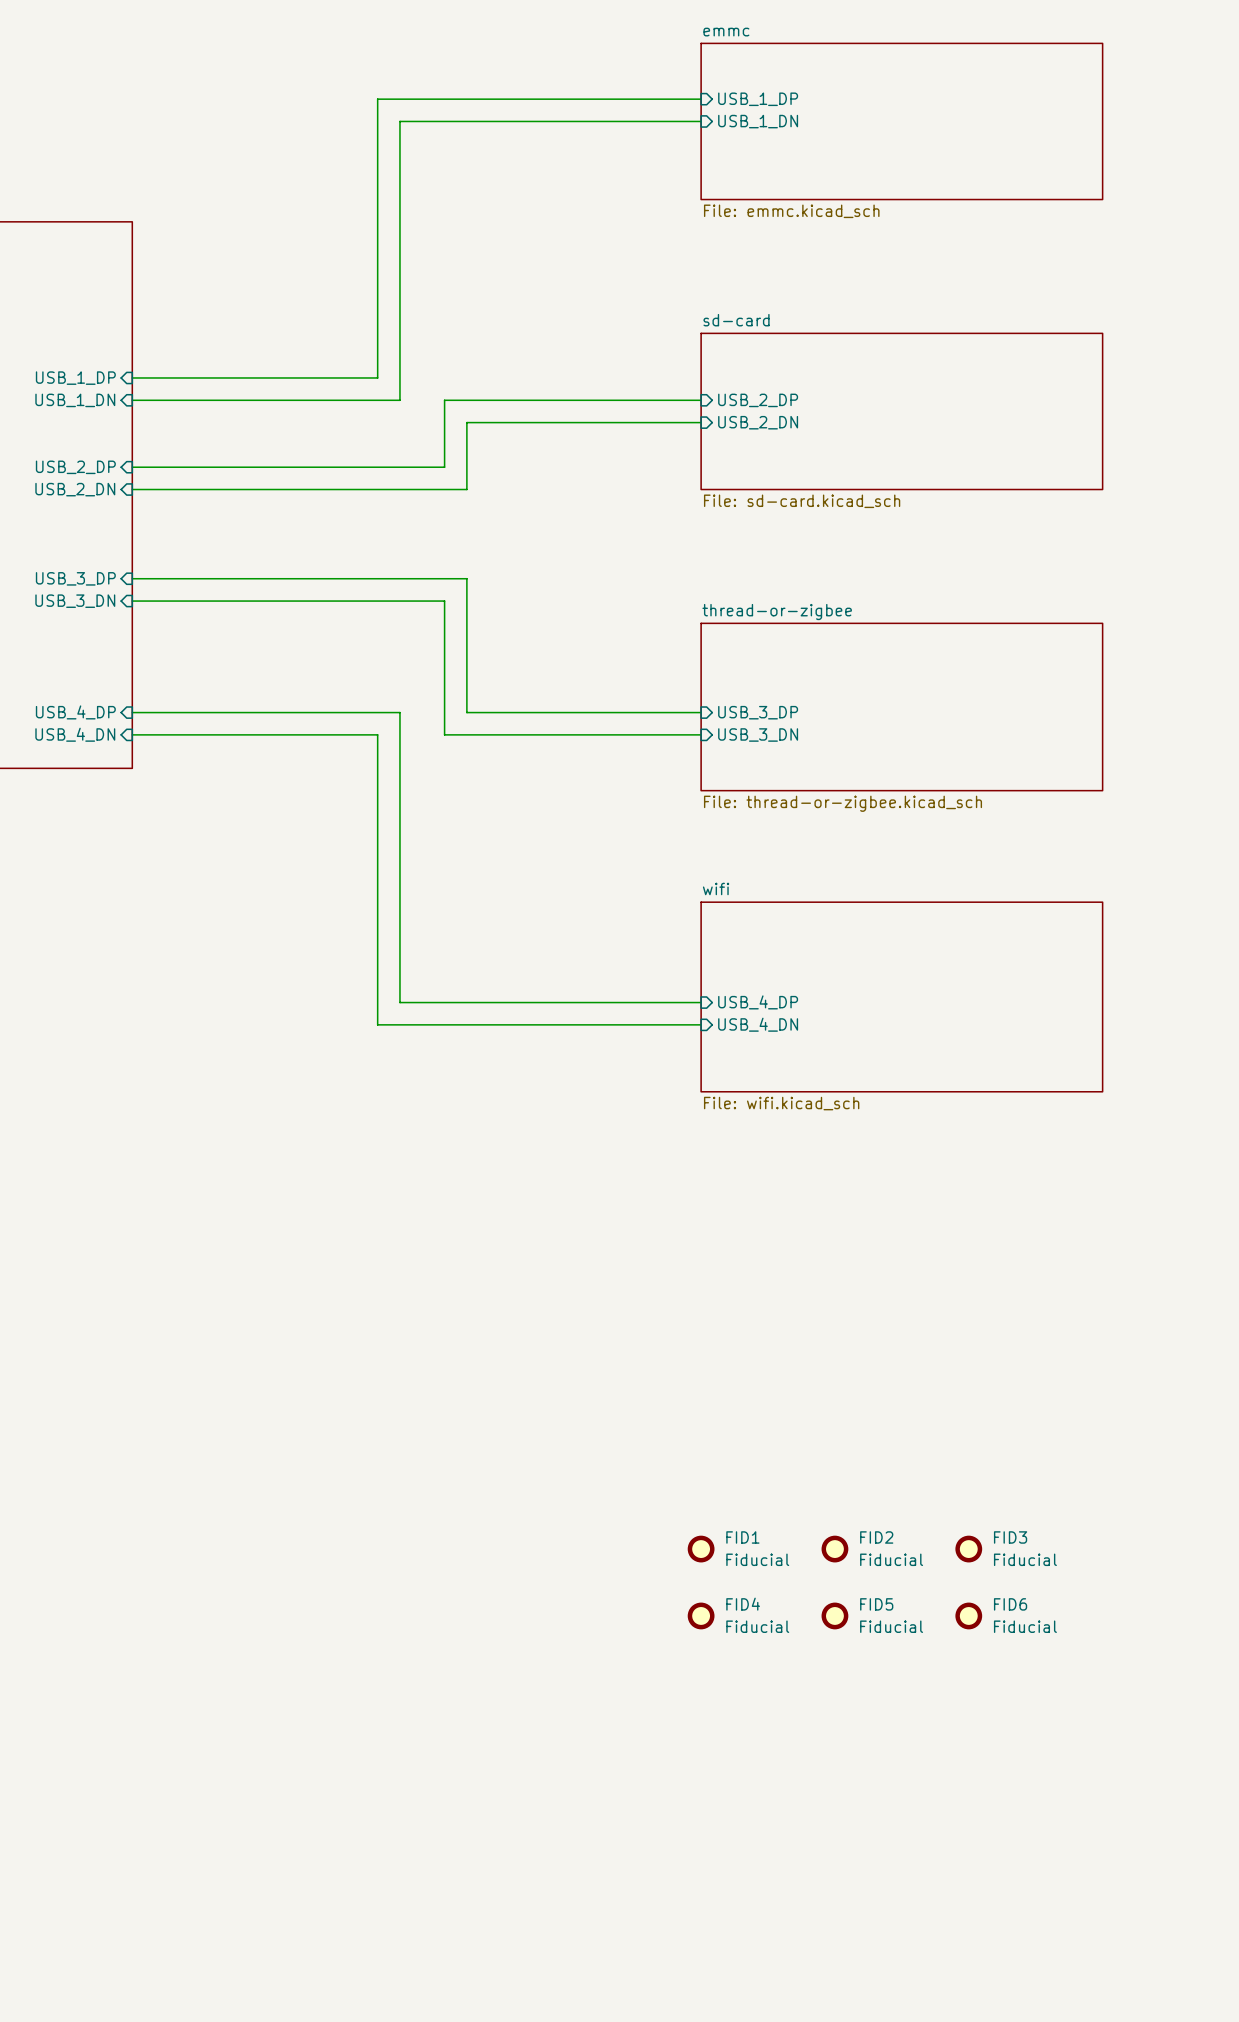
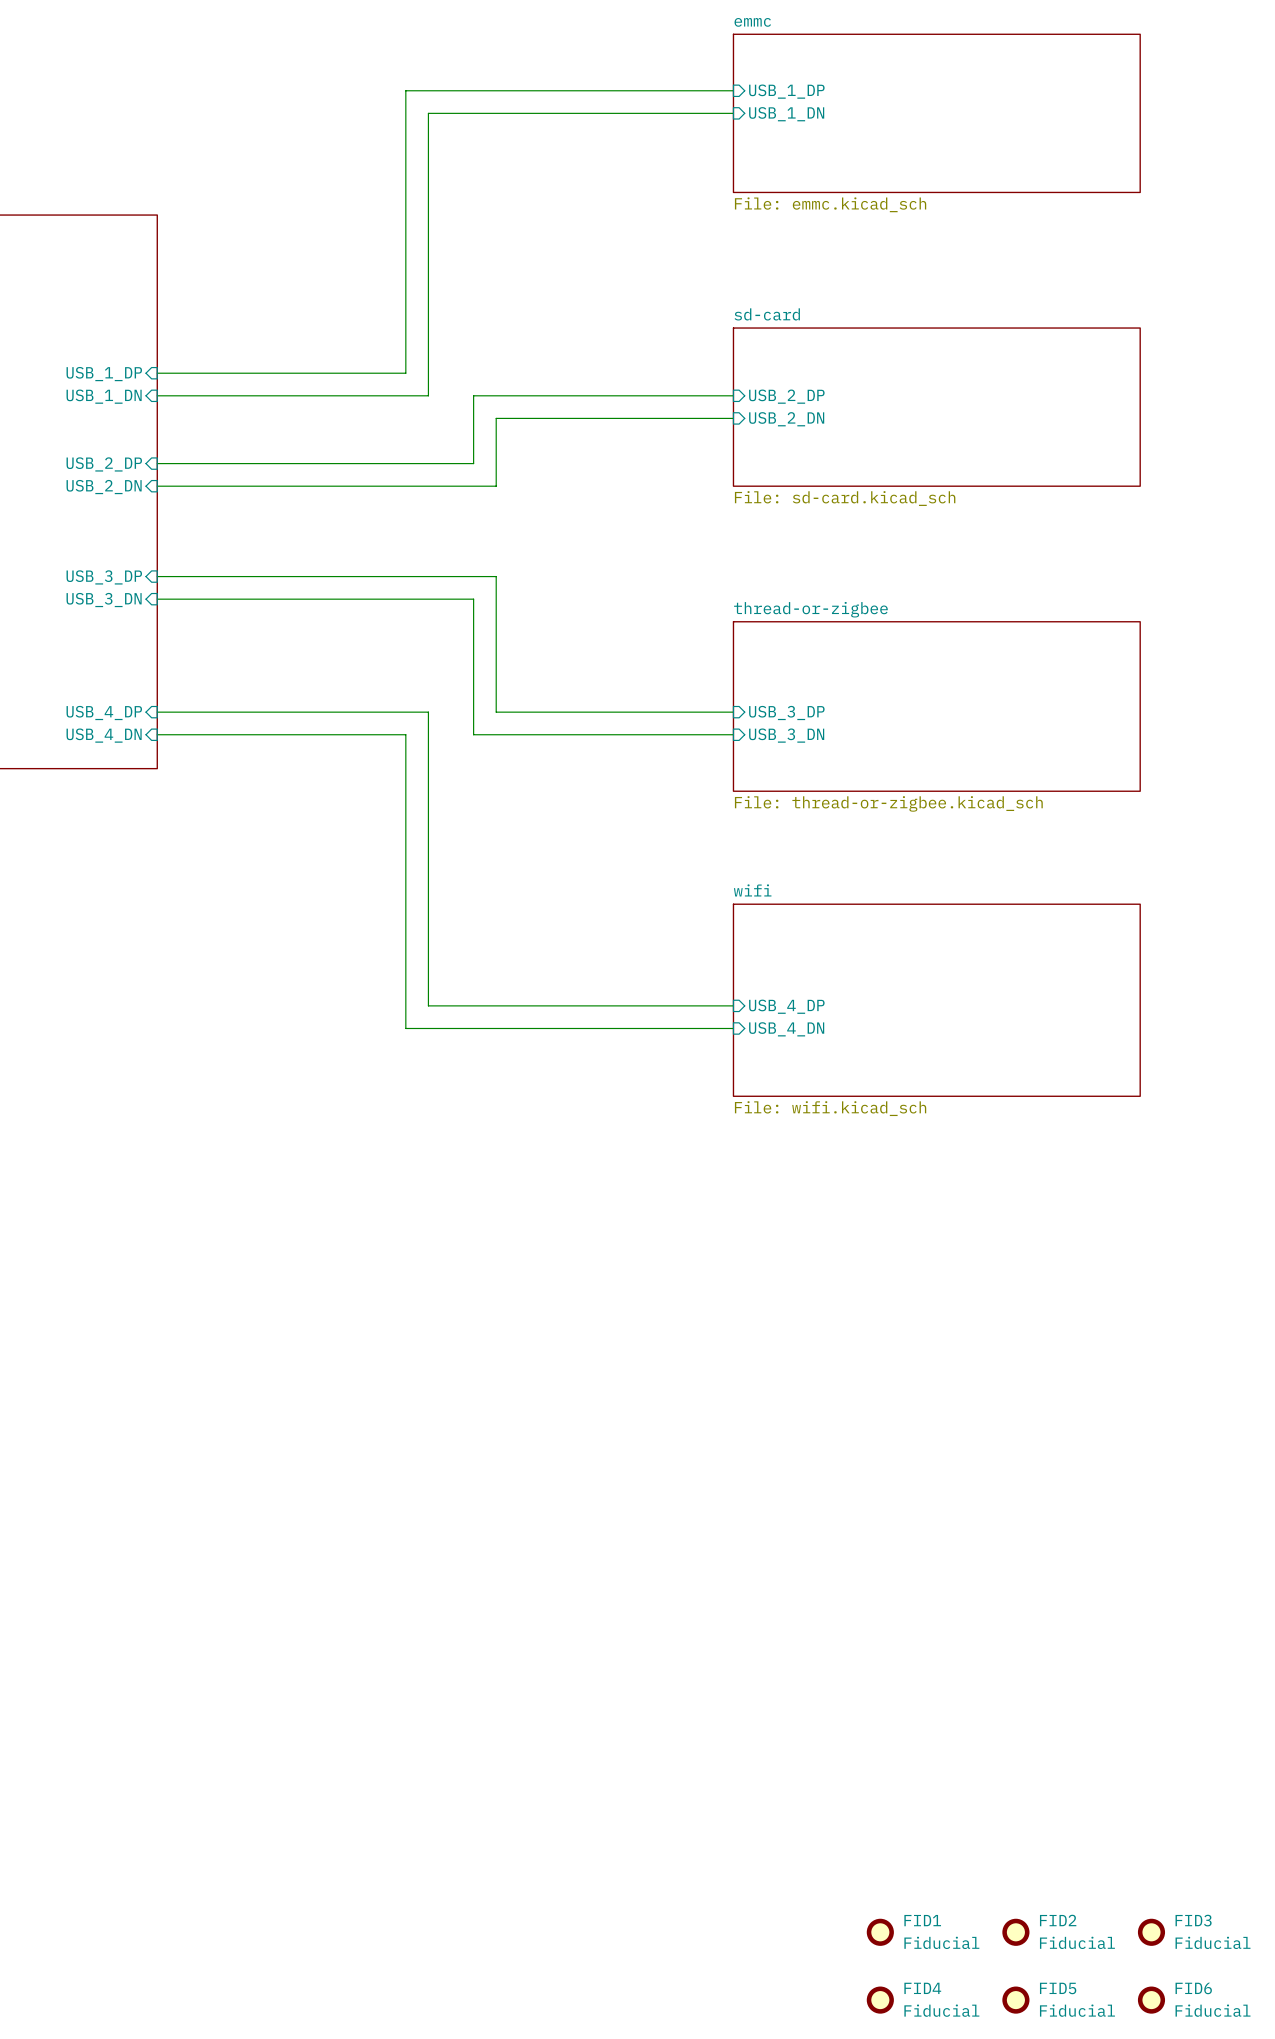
FID1 position: (701, 1549) -> (880, 1932)
FID2 position: (834, 1549) -> (1015, 1932)
FID3 position: (968, 1549) -> (1151, 1932)
FID4 position: (701, 1615) -> (880, 2000)
FID5 position: (834, 1615) -> (1015, 2000)
FID6 position: (968, 1615) -> (1151, 2000)

